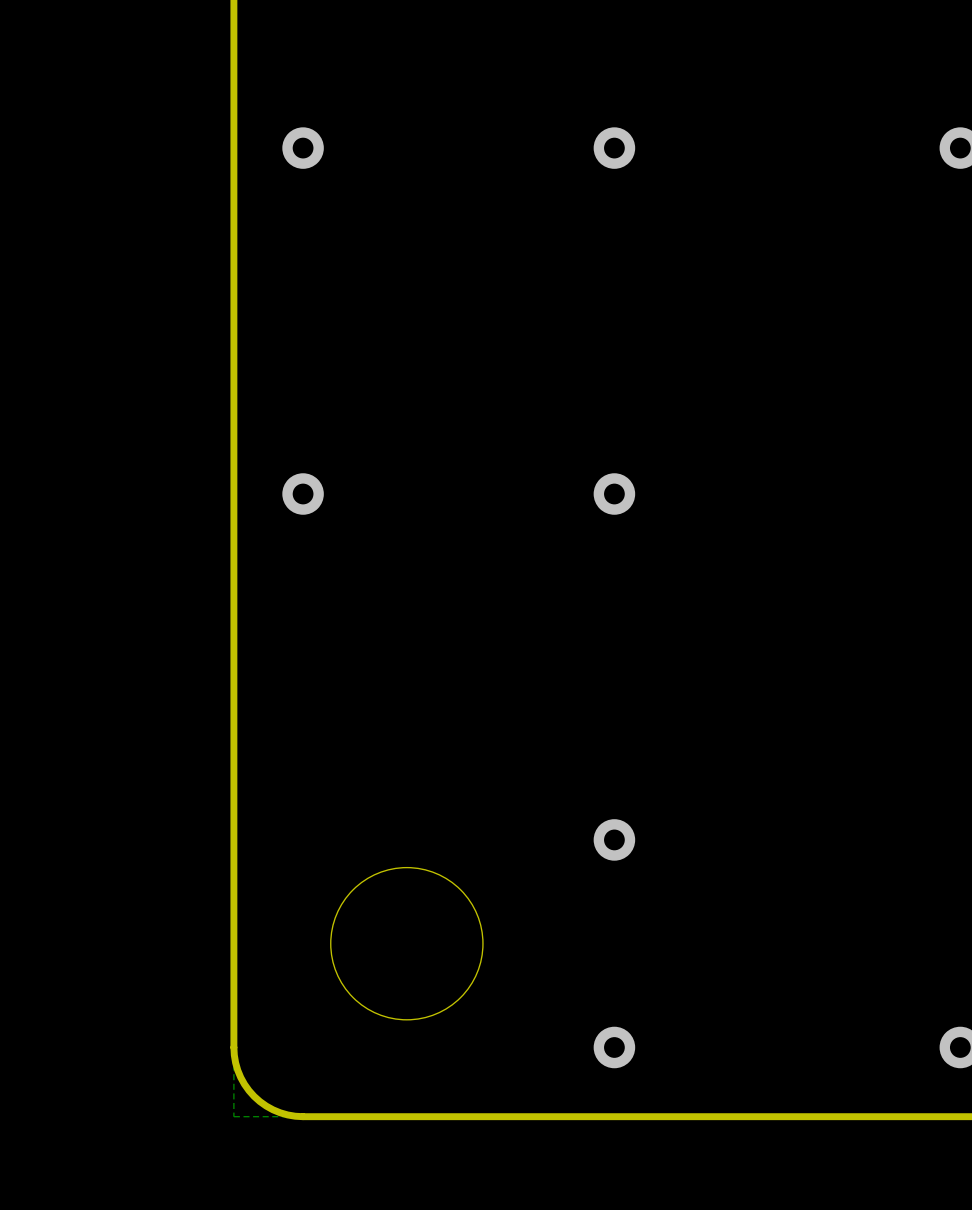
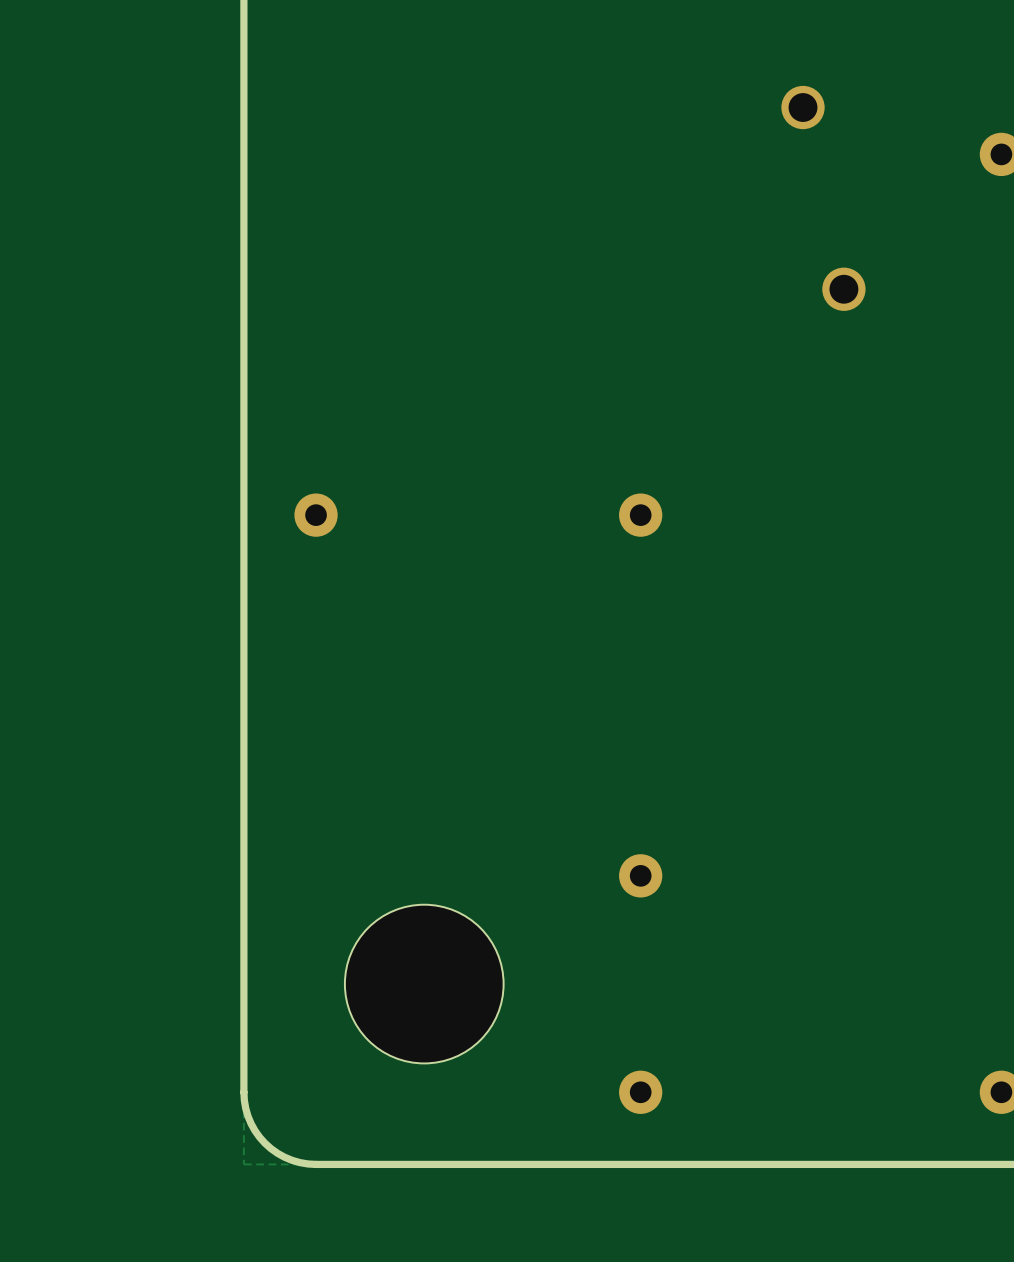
via: none -> (803, 107)
via: (303, 148) -> none
via: (614, 148) -> none
via: none -> (843, 289)

